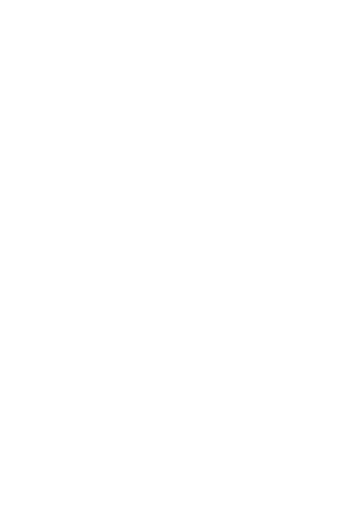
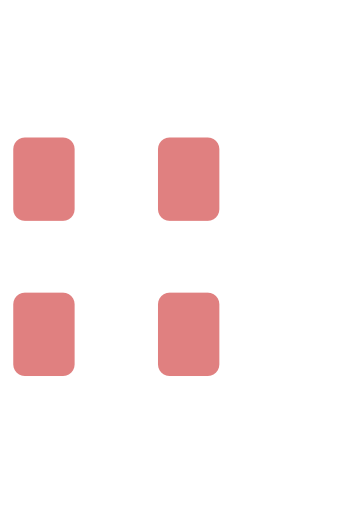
part: none -> (116, 179)
part: none -> (116, 334)

